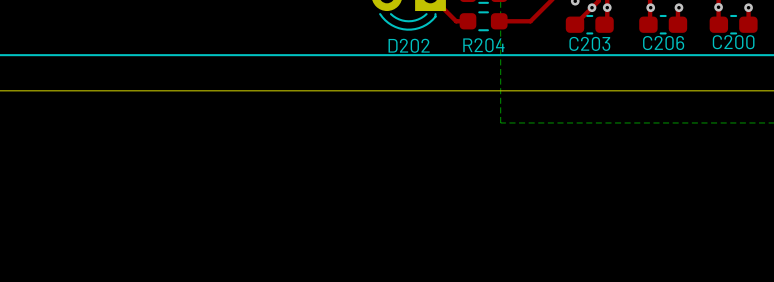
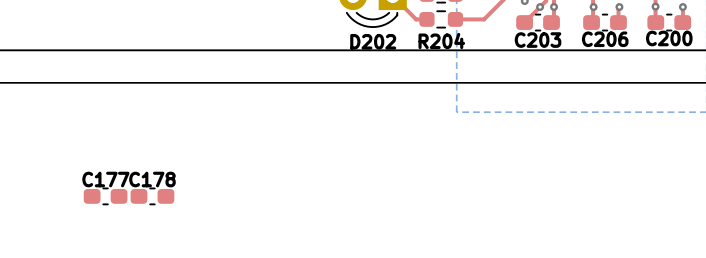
C177: none -> (105, 196)
C178: none -> (152, 196)

